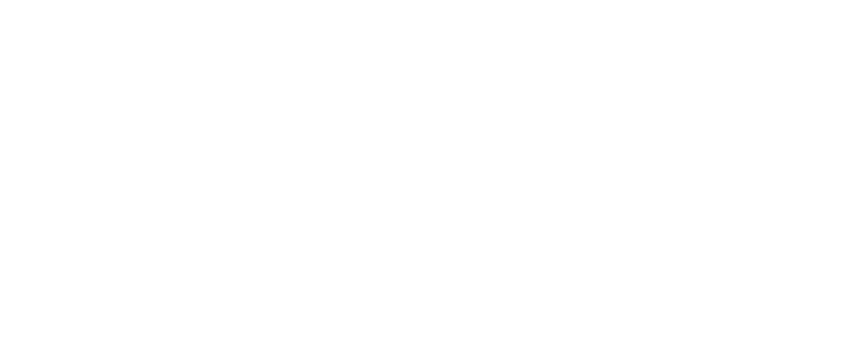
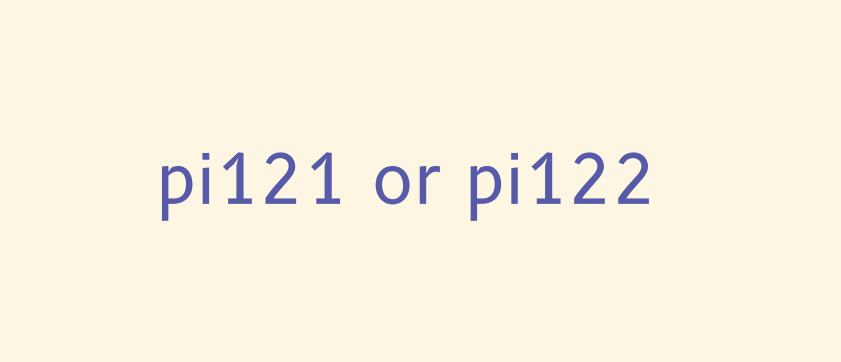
text: none -> pi121 or pi122 (405, 186)

